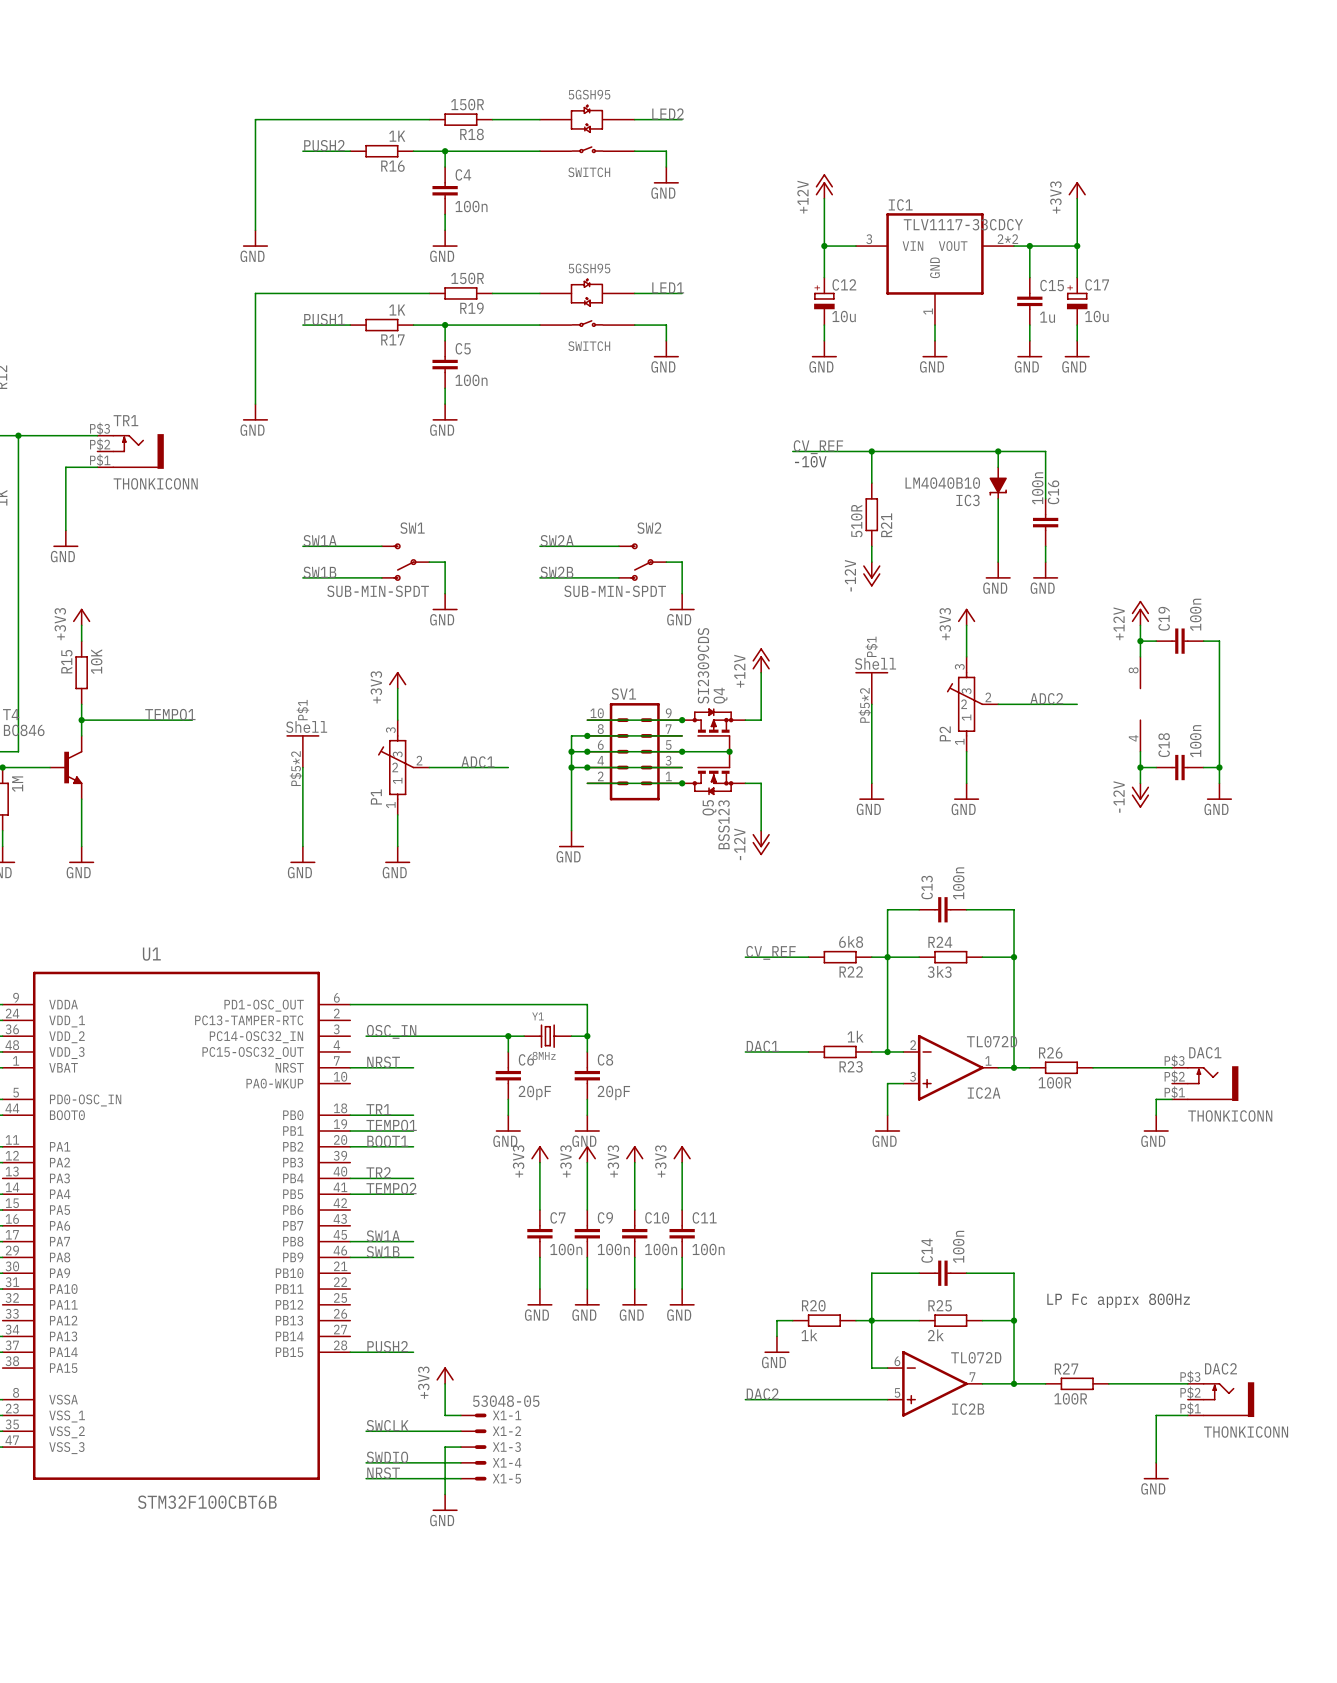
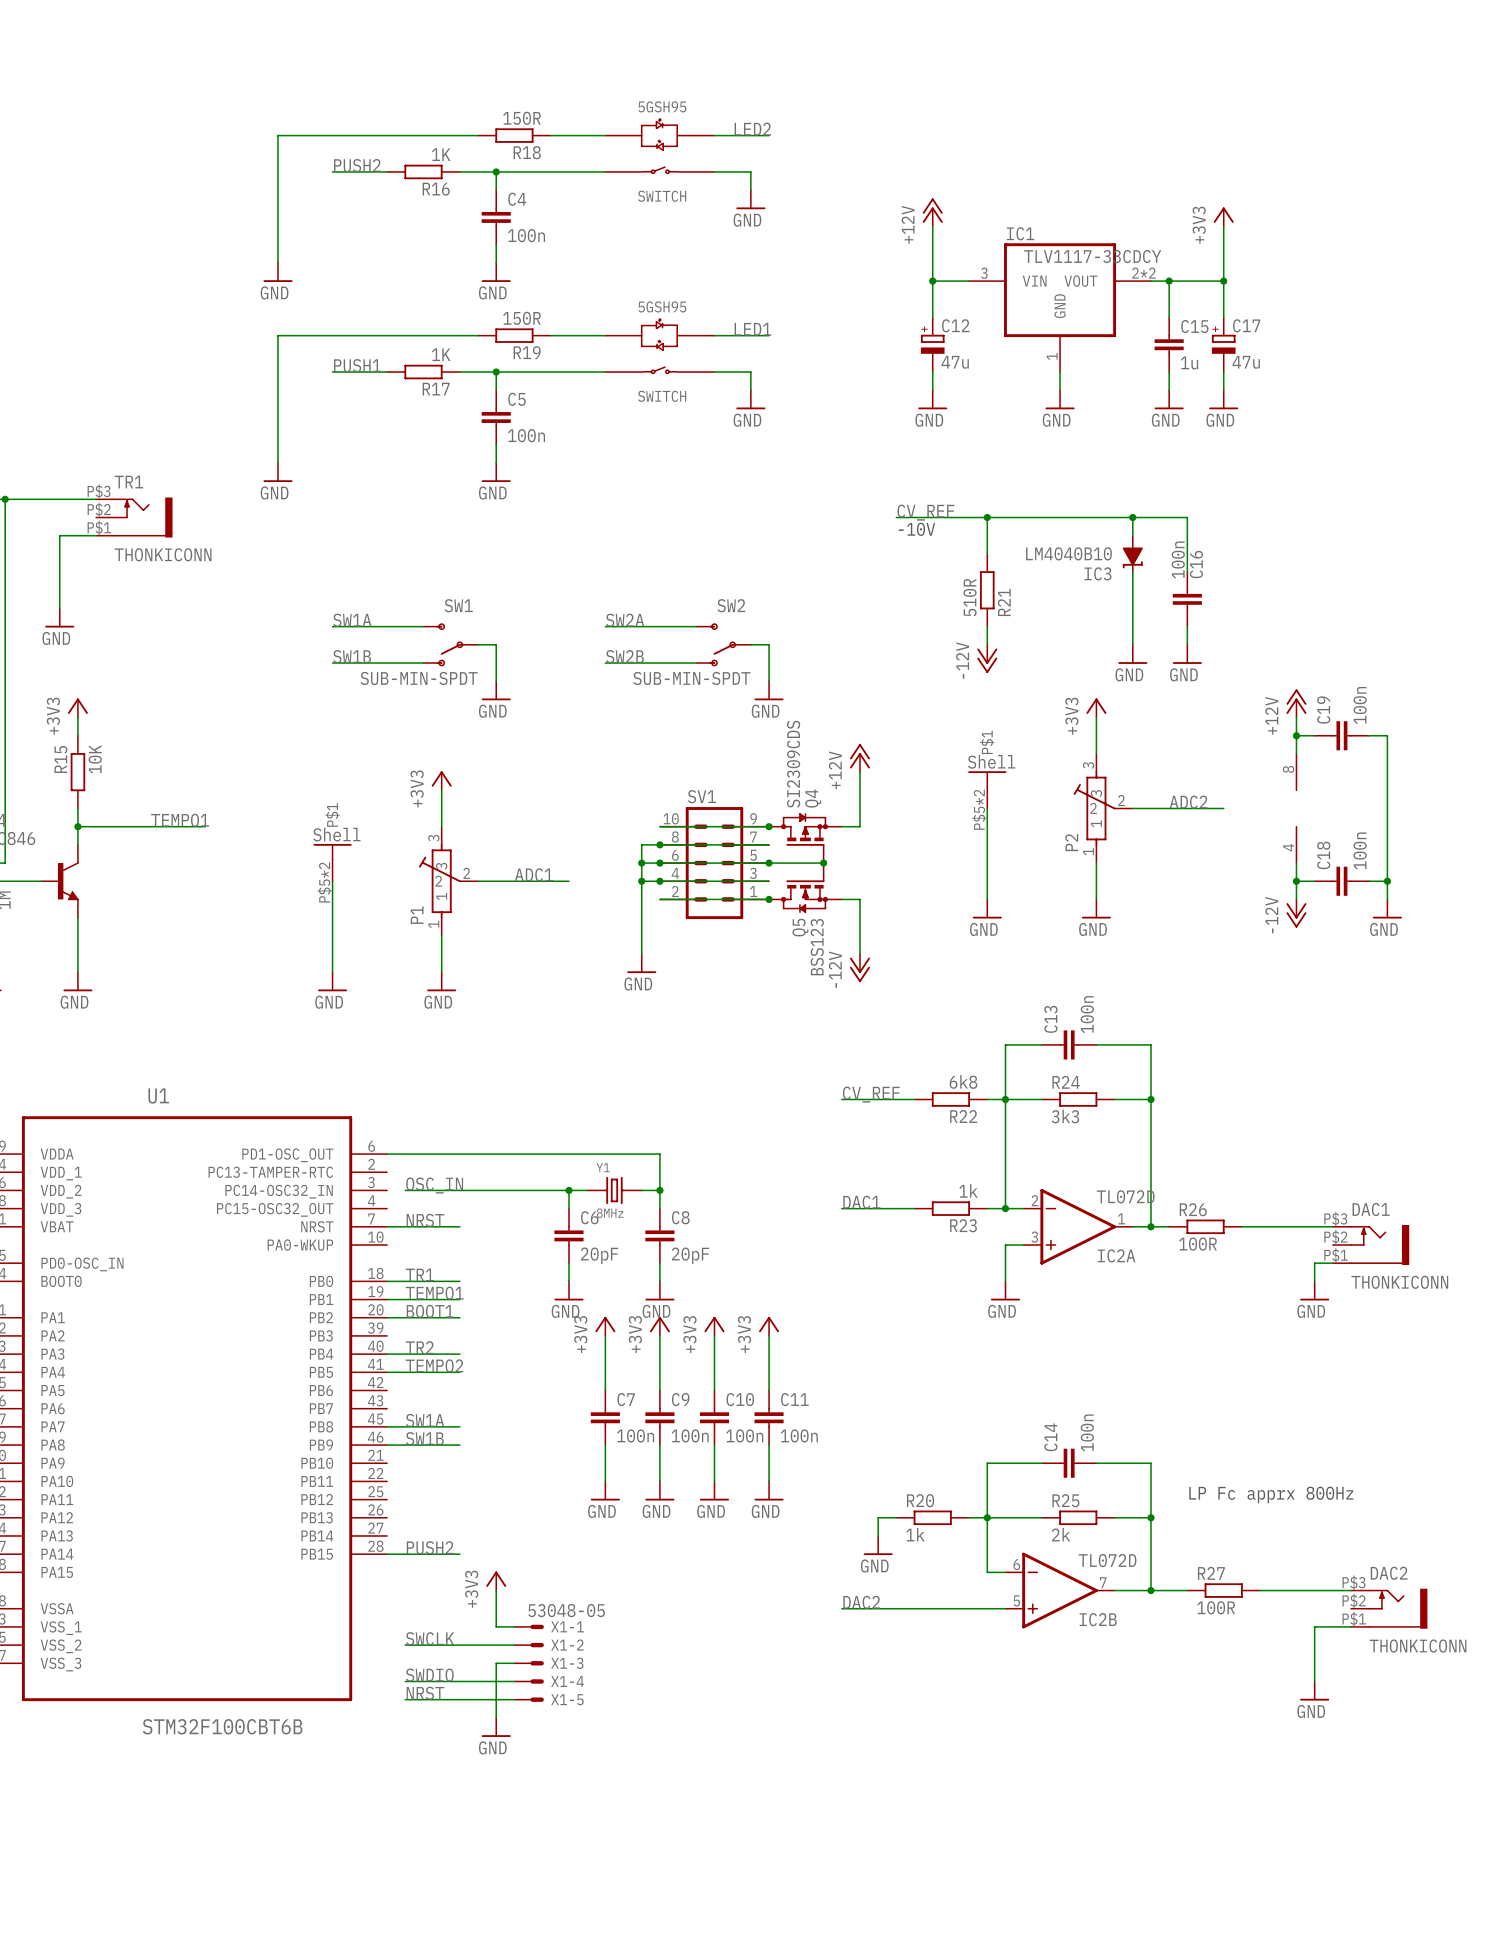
C12 value: 10u (844, 316) -> 47u (955, 362)
C17 value: 10u (1096, 316) -> 47u (1246, 362)

